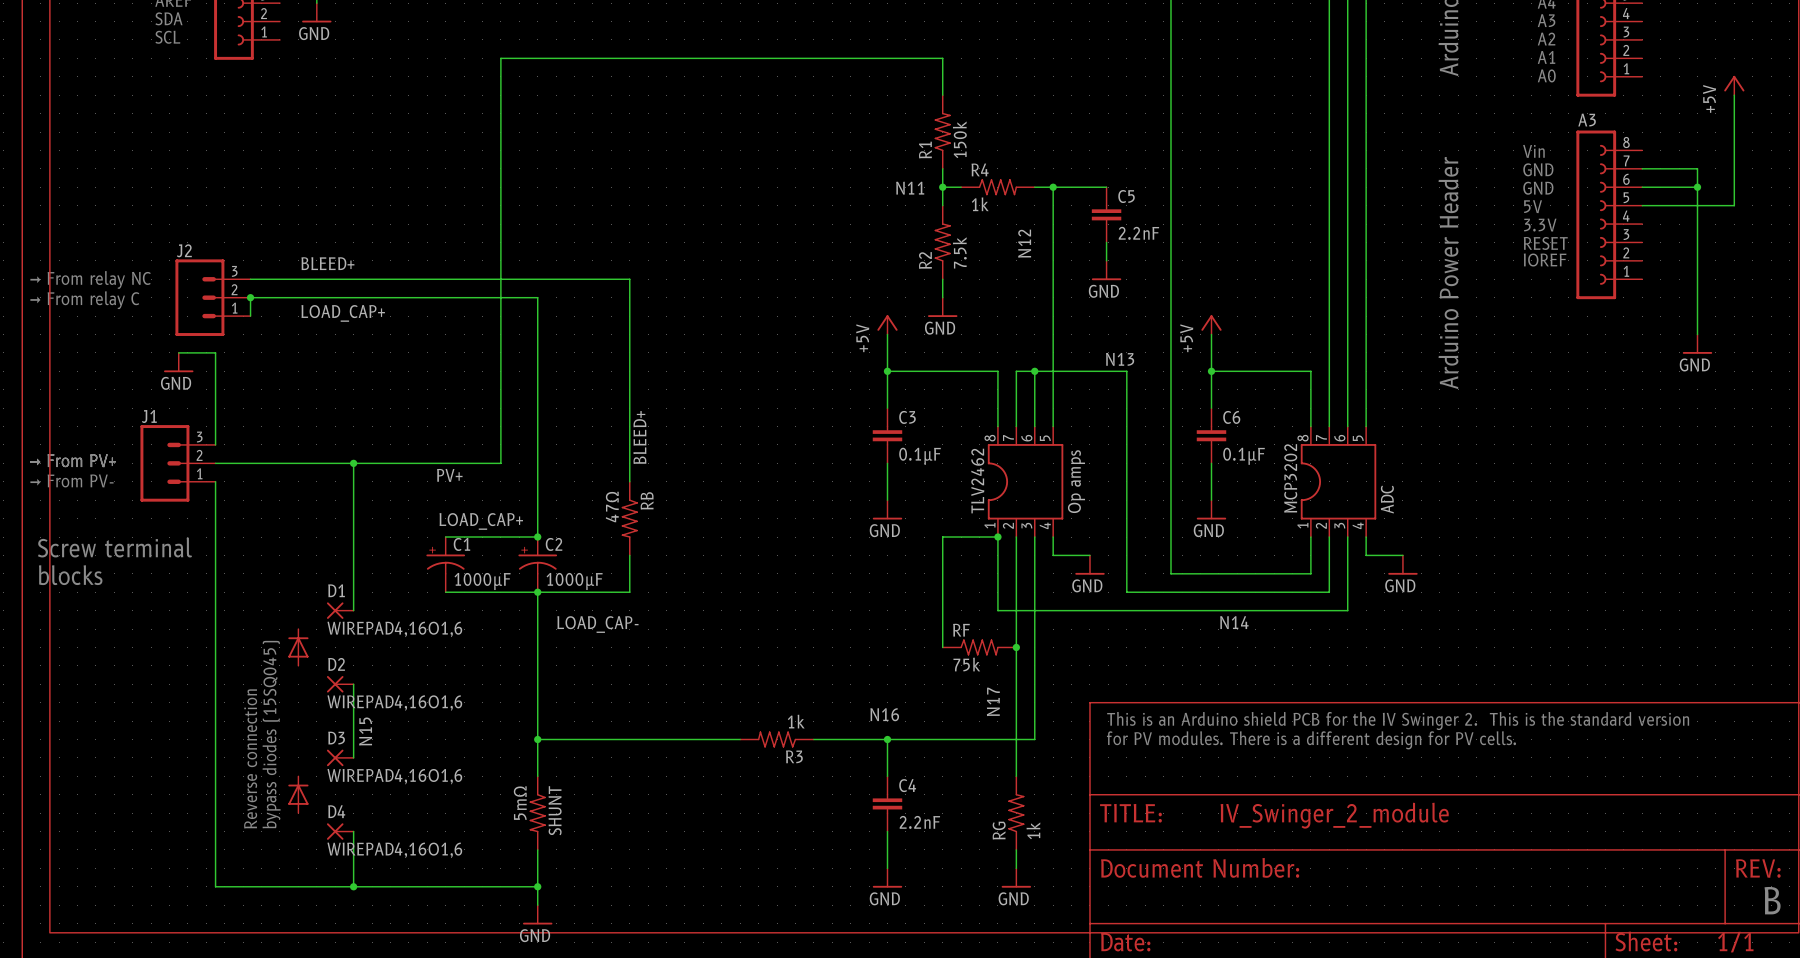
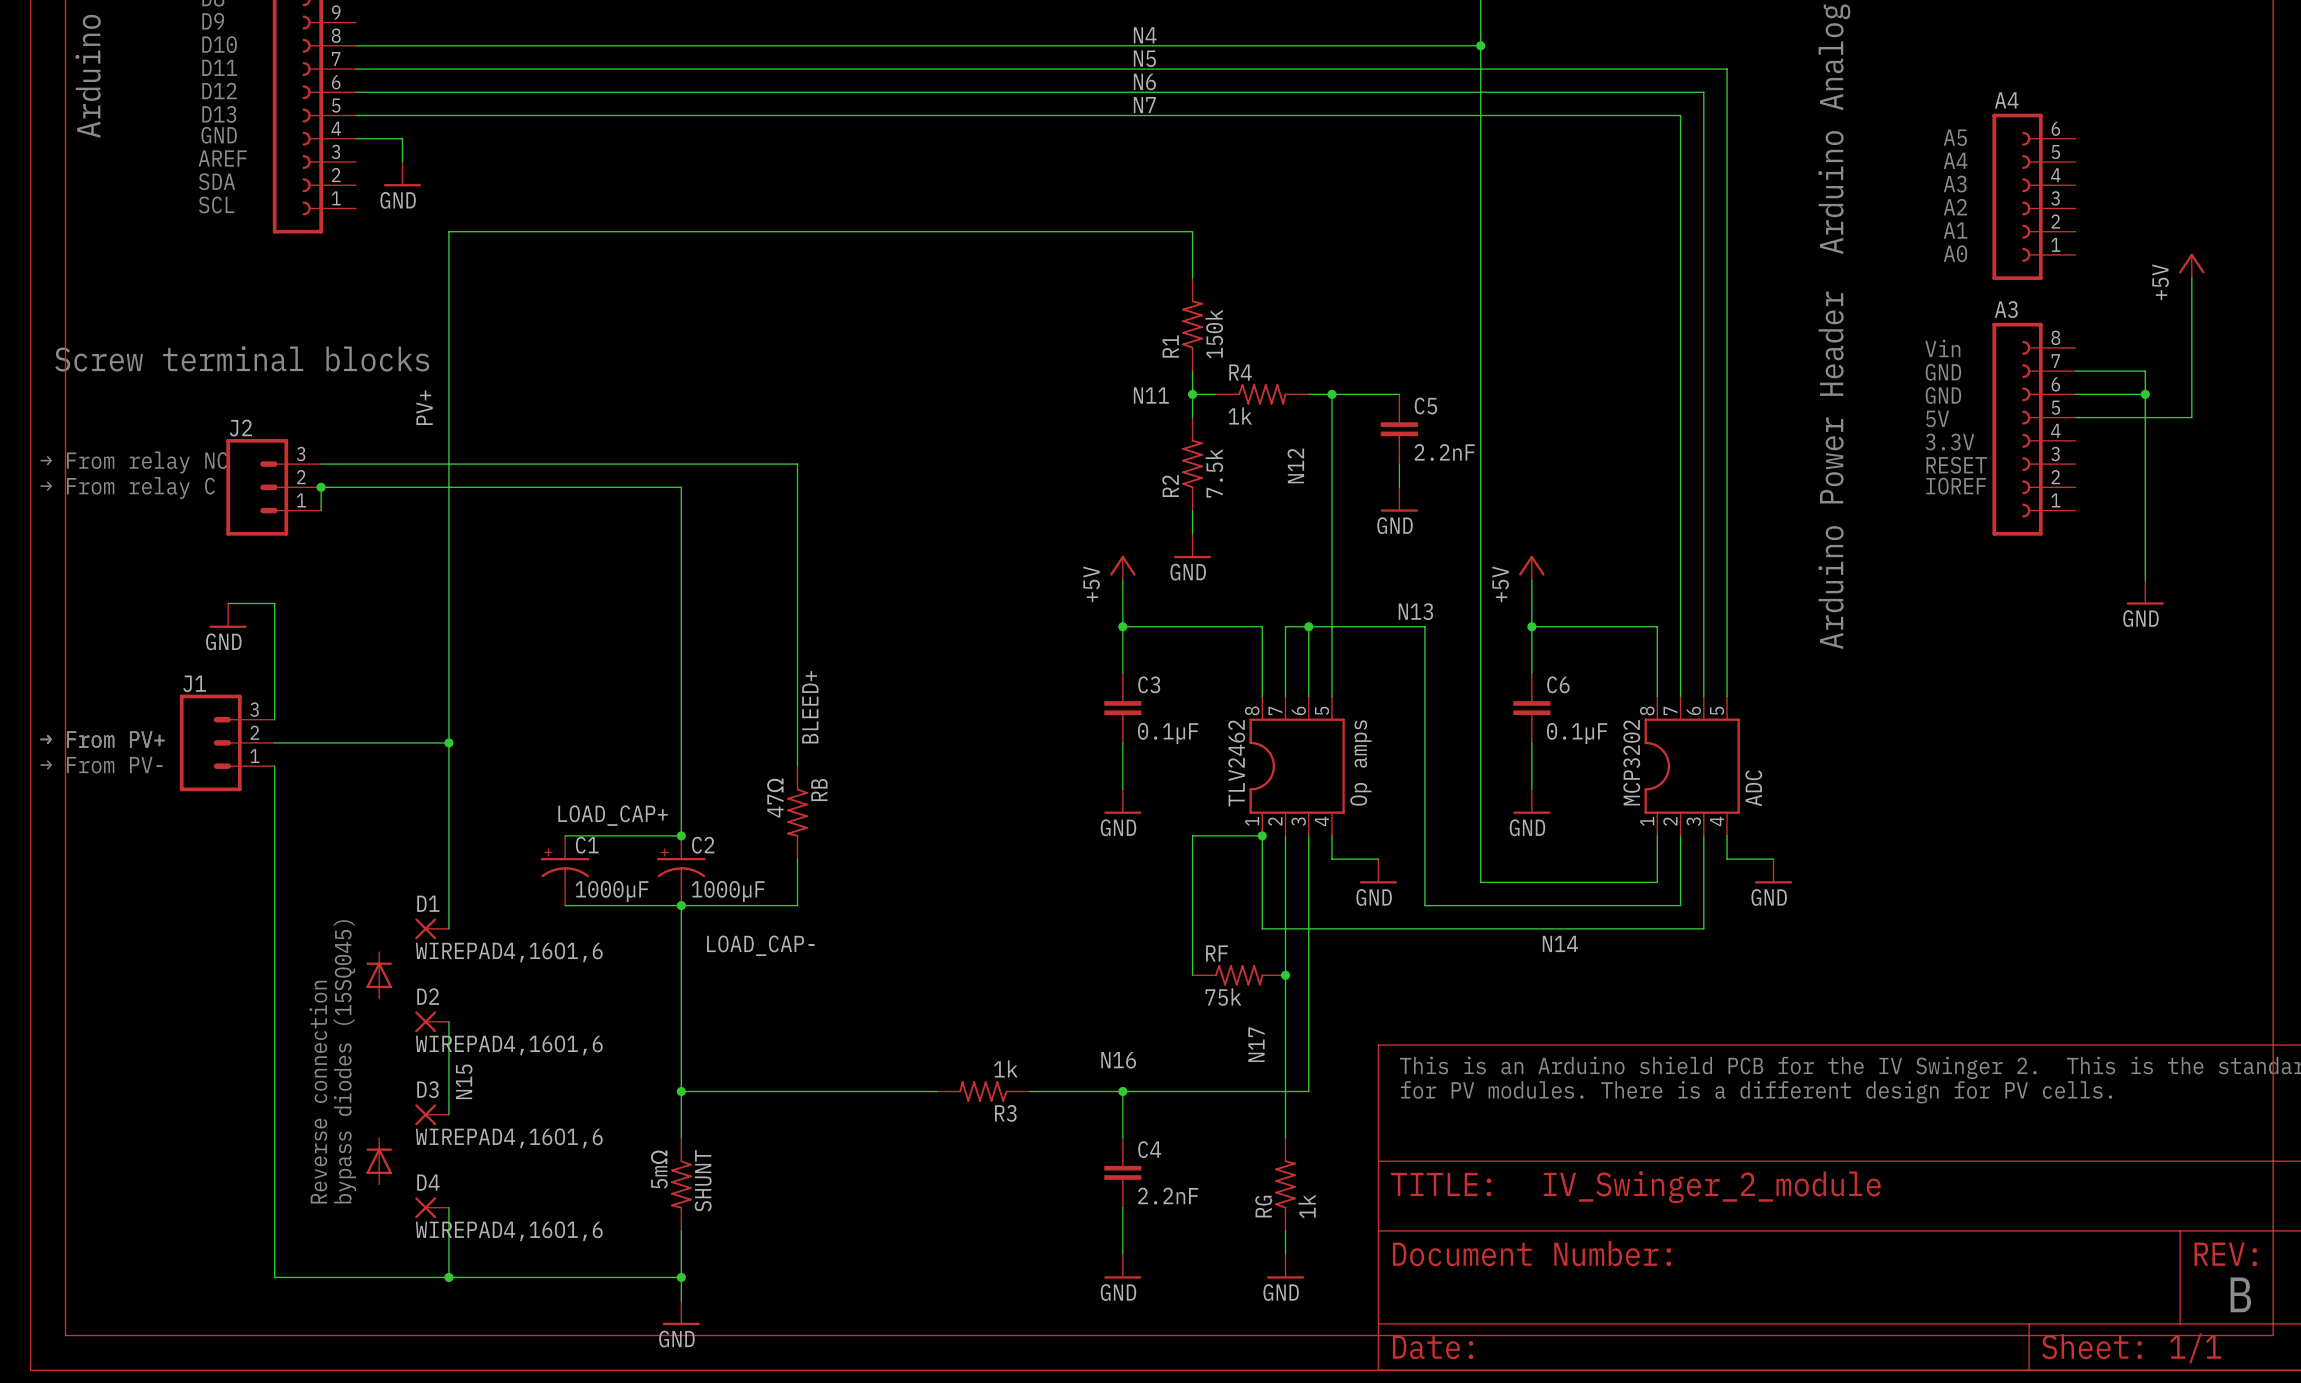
wire: (500, 58) (500, 463) (353, 463) -> (634, 231) (448, 231) (448, 742)
text: none -> Screw terminal blocks (242, 358)
label: none -> PV+ (424, 407)
label: BLEED+ (327, 263) -> none
text position: → From relay NC (90, 279) -> → From relay NC (133, 462)
wire: (250, 279) (629, 279) -> (321, 464) (797, 464) (797, 510)
J2 position: (212, 297) -> (273, 487)
junction position: (250, 297) -> (321, 487)
wire: (537, 297) (250, 297) (250, 316) -> (681, 533) (681, 487) (321, 487) (321, 510)
text position: → From relay C (84, 300) -> → From relay C (127, 488)
label: LOAD_CAP+ (343, 313) -> none
label: PV+ (449, 475) -> none
text: Screw terminal (114, 547) -> none
text: blocks (70, 575) -> none

